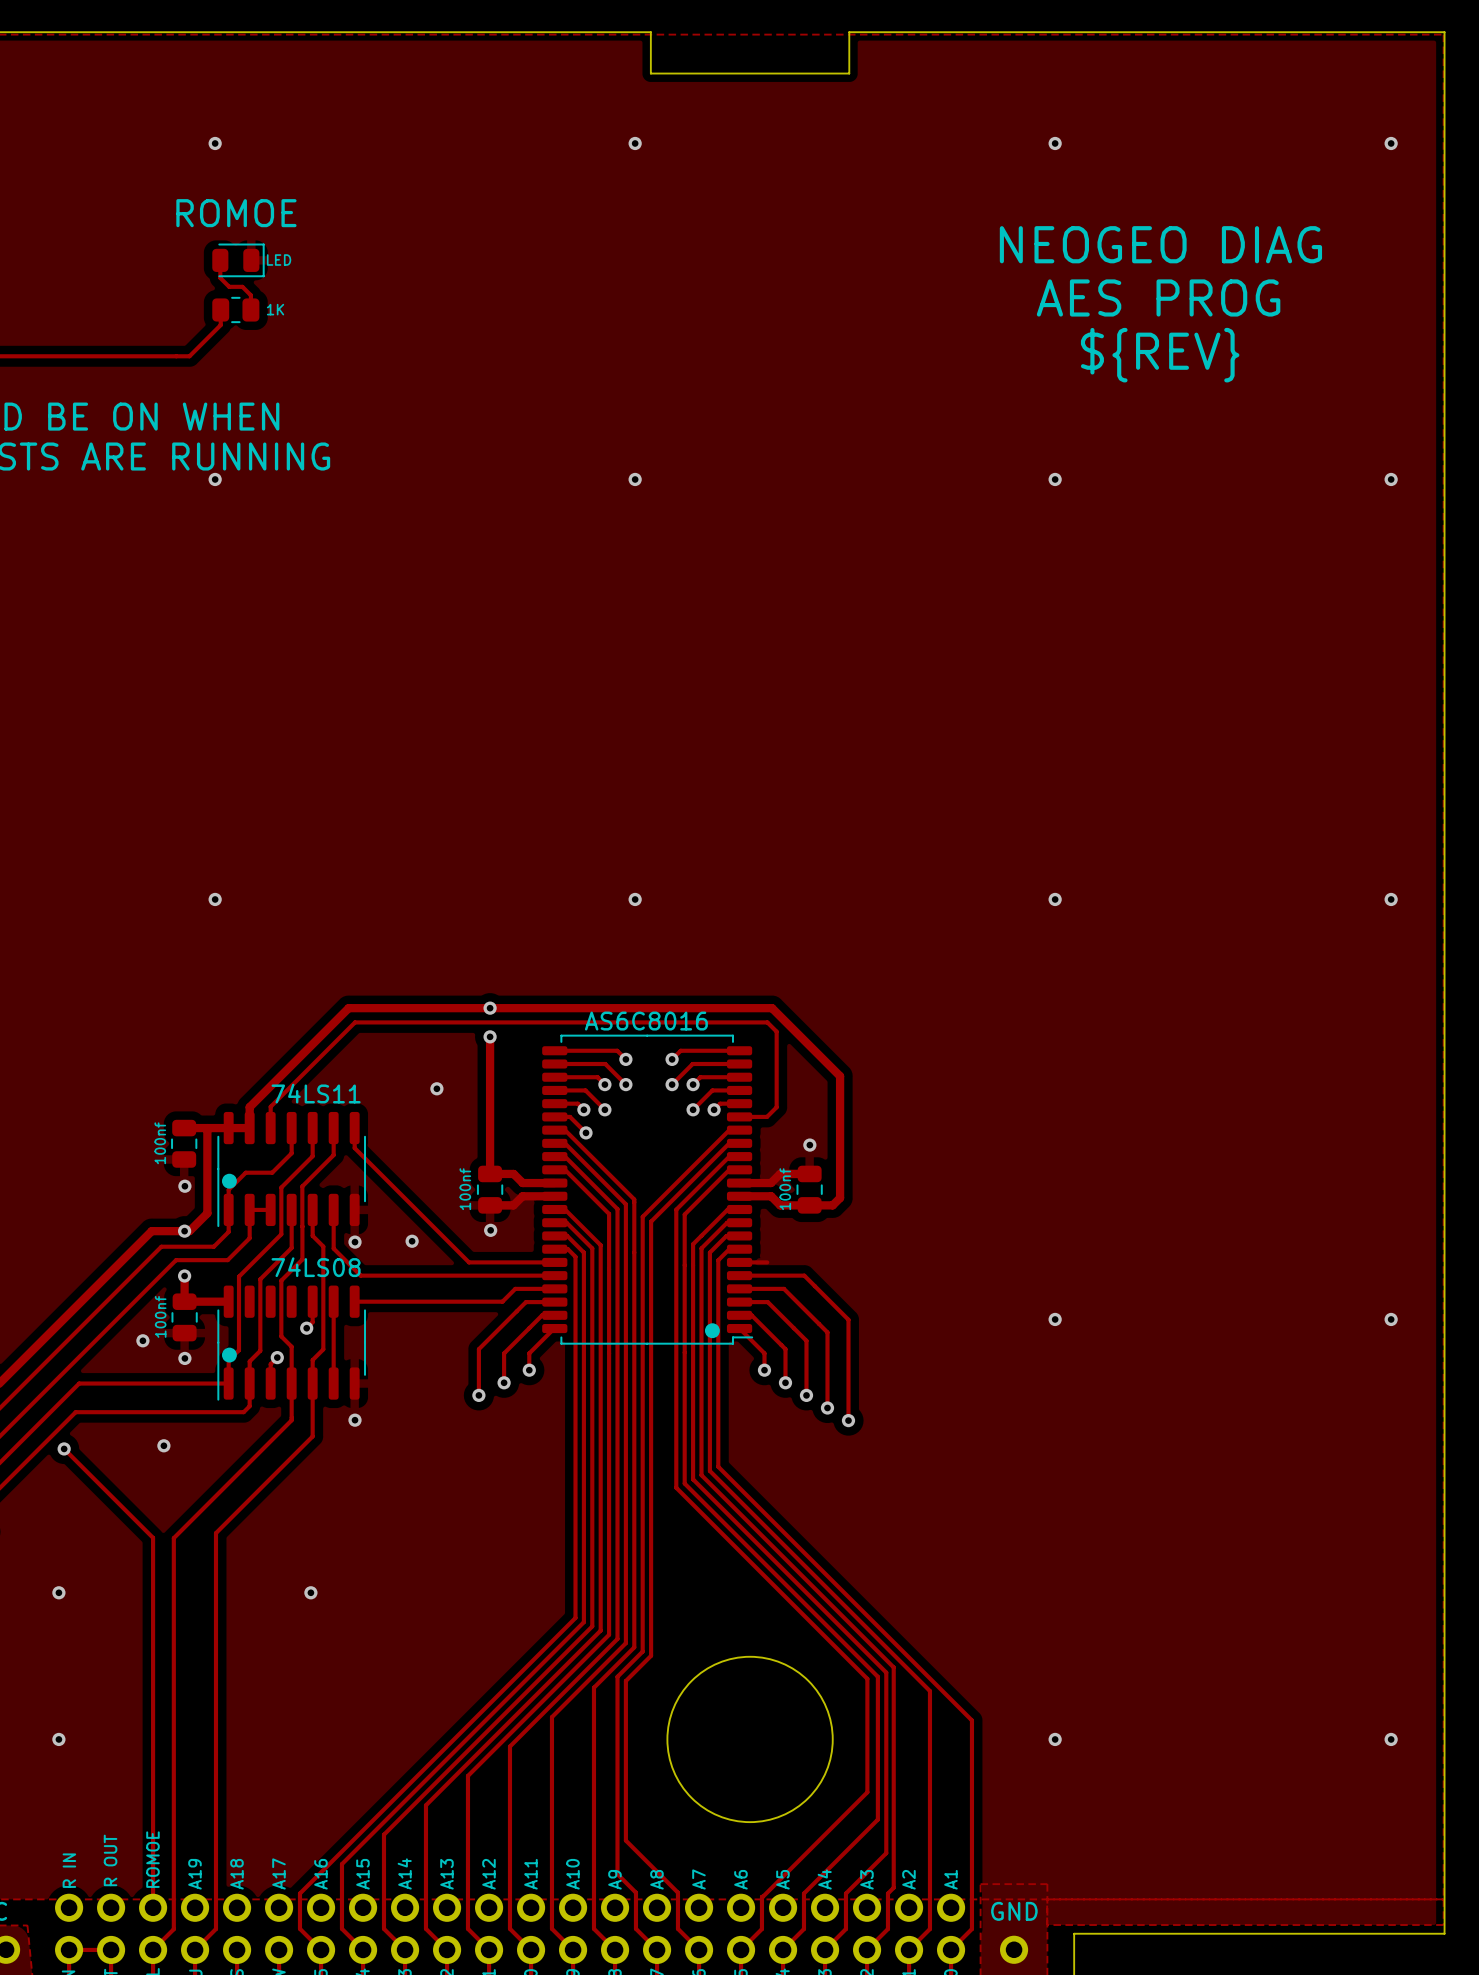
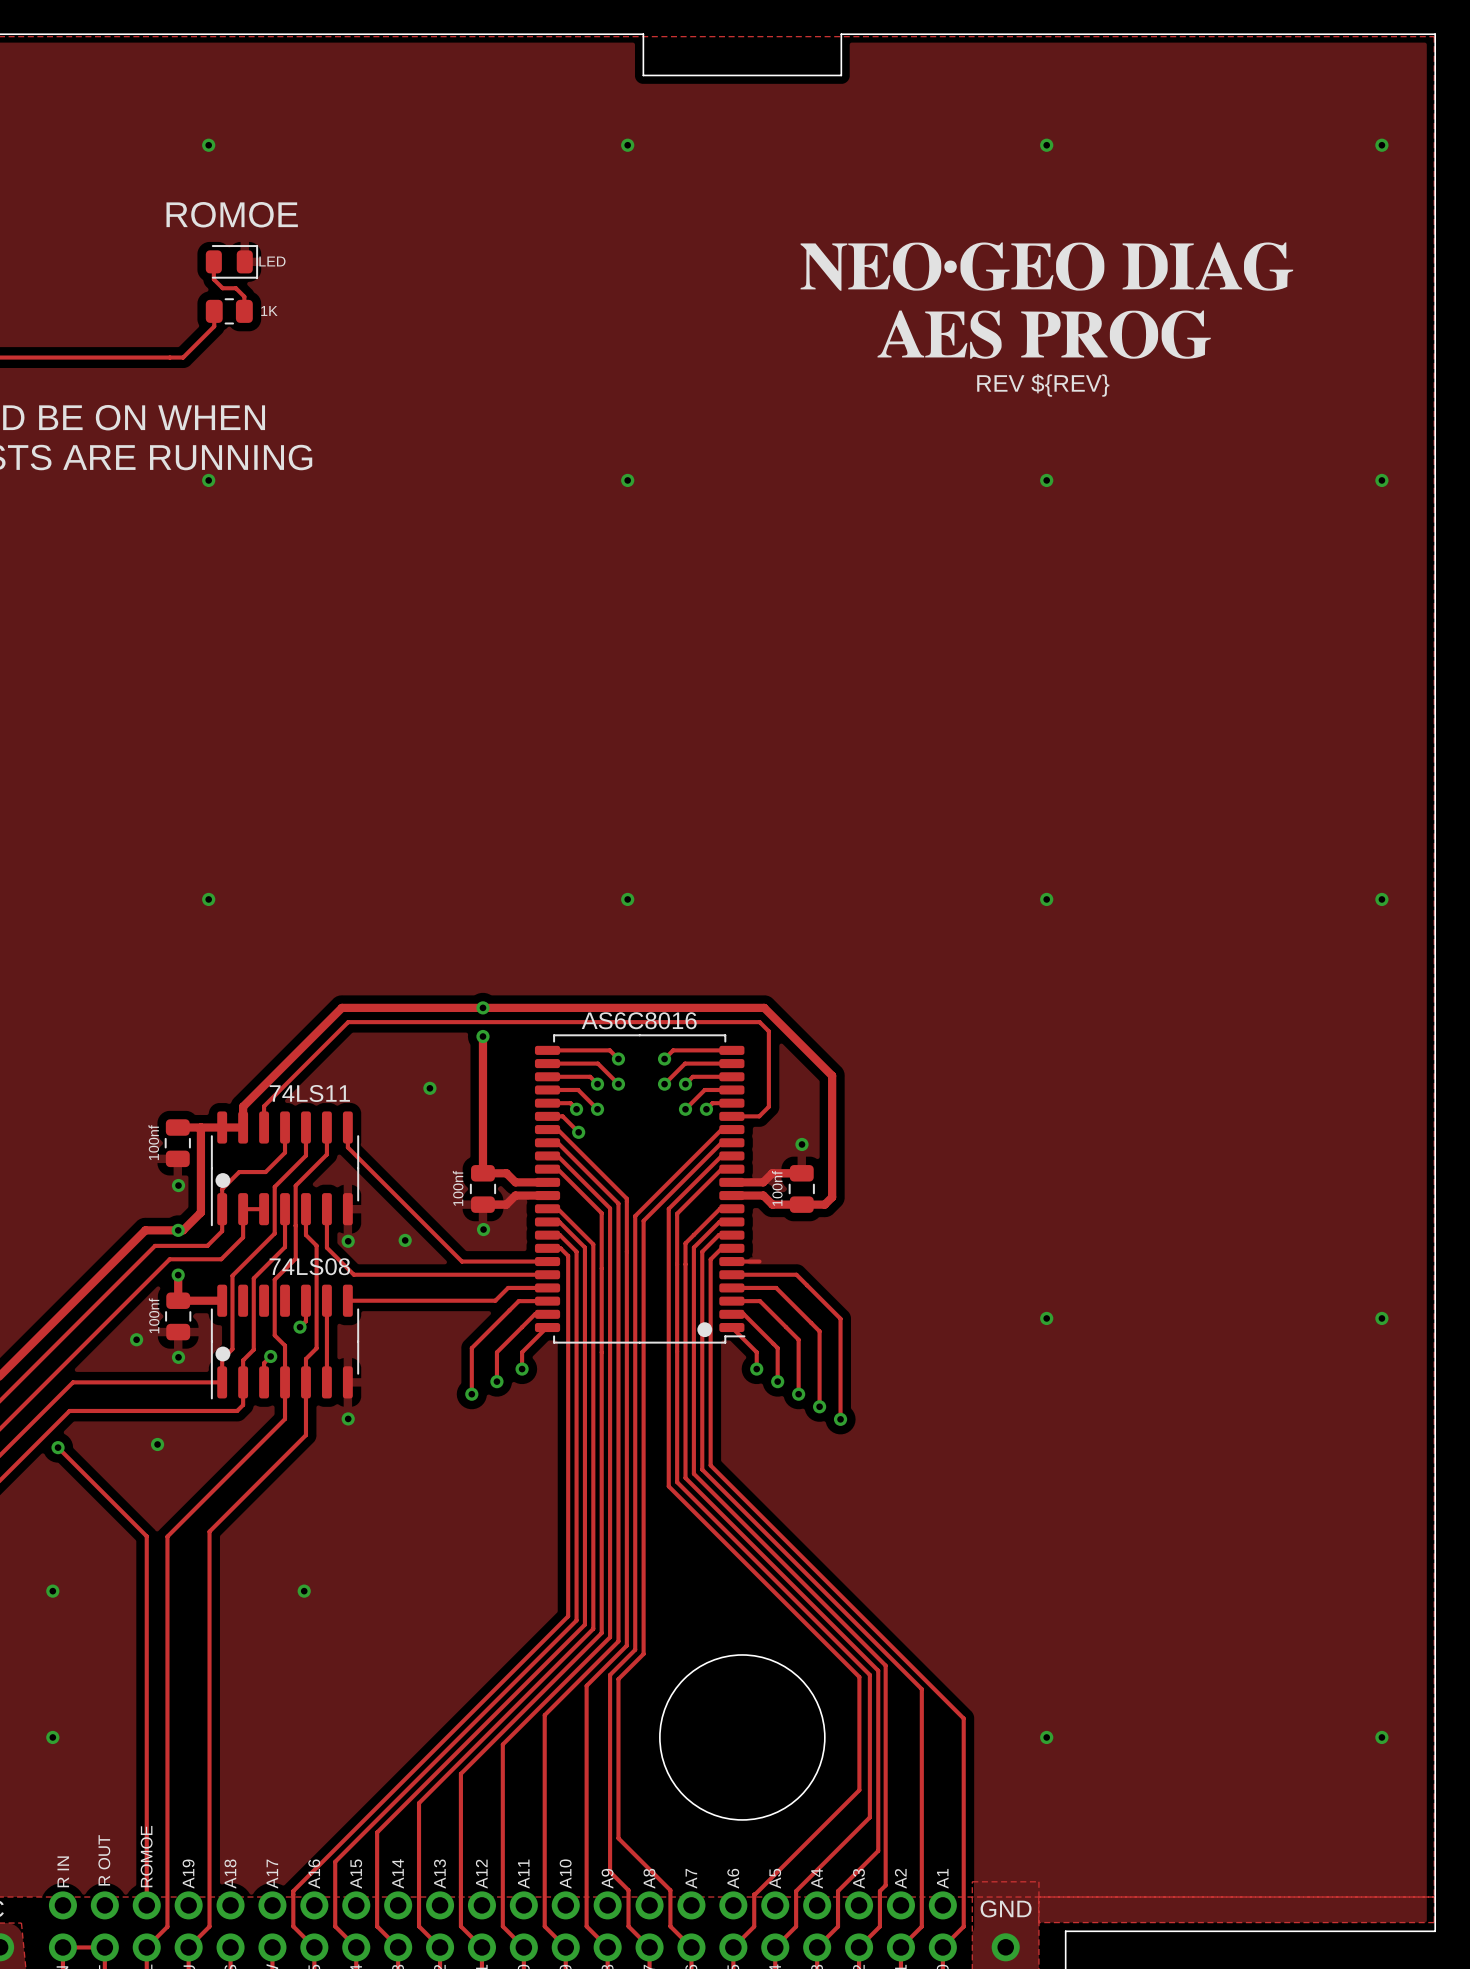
drawing: none -> [800, 242, 1294, 359]
text: NEOGEO DIAG (1160, 244) -> none
text: AES PROG (1158, 297) -> none
text: ${REV} (1160, 355) -> REV ${REV} (1043, 385)

